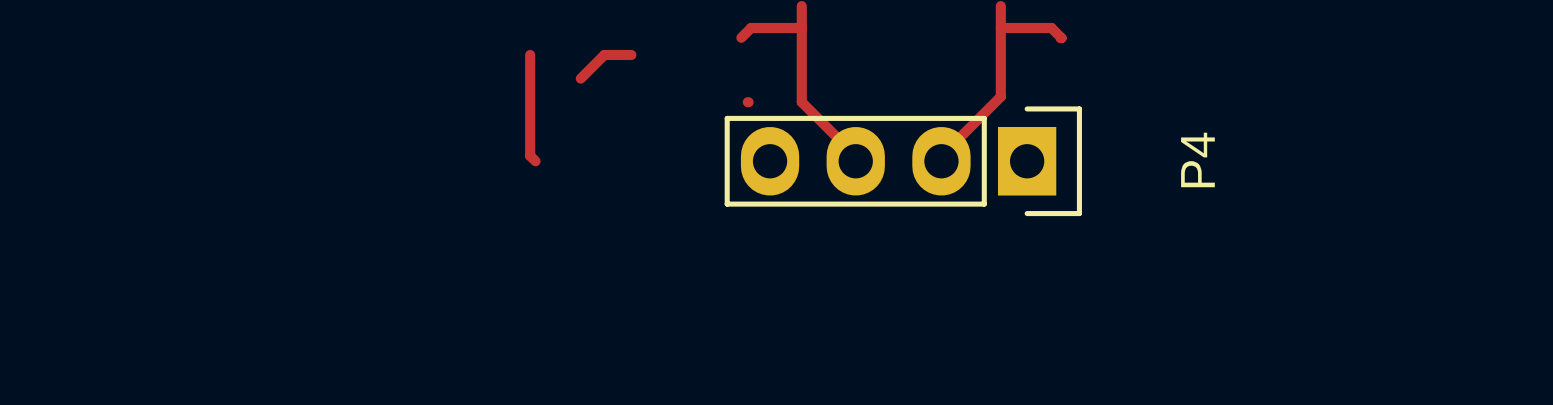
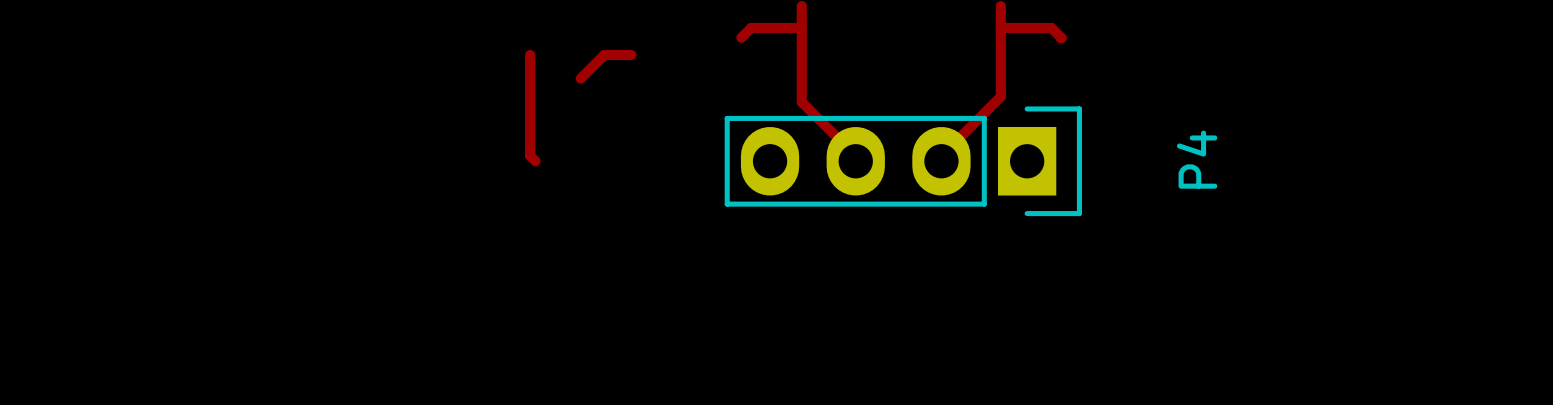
track: (747, 102) (748, 102) -> none

